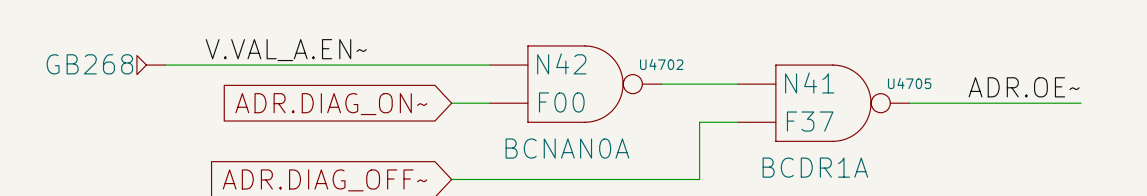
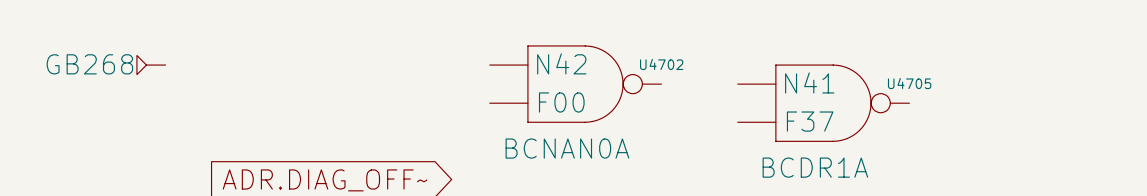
label: V.VAL_A.EN~ (286, 50) -> none
wire: (165, 65) (489, 65) -> none
wire: (661, 84) (737, 84) -> none
label: ADR.OE~ (1024, 87) -> none
wire: (451, 103) (489, 103) -> none
wire: (909, 103) (1081, 103) -> none
global label: ADR.DIAG_ON~ (331, 104) -> none
wire: (737, 122) (699, 122) (699, 179) (451, 179) -> none

